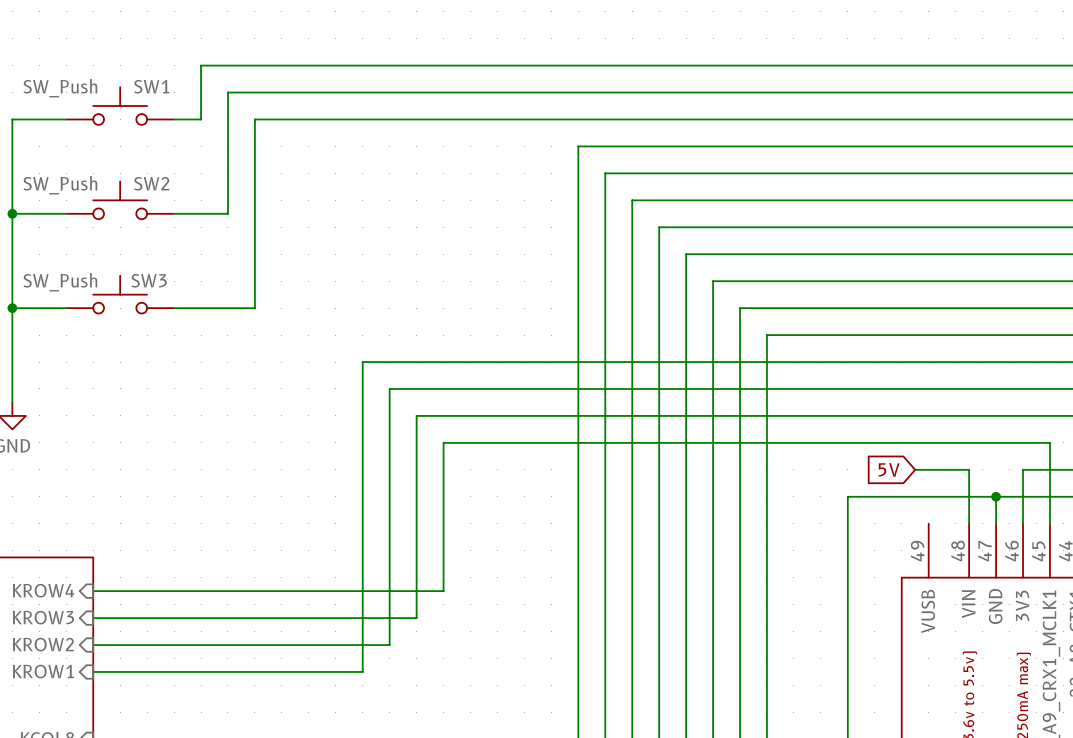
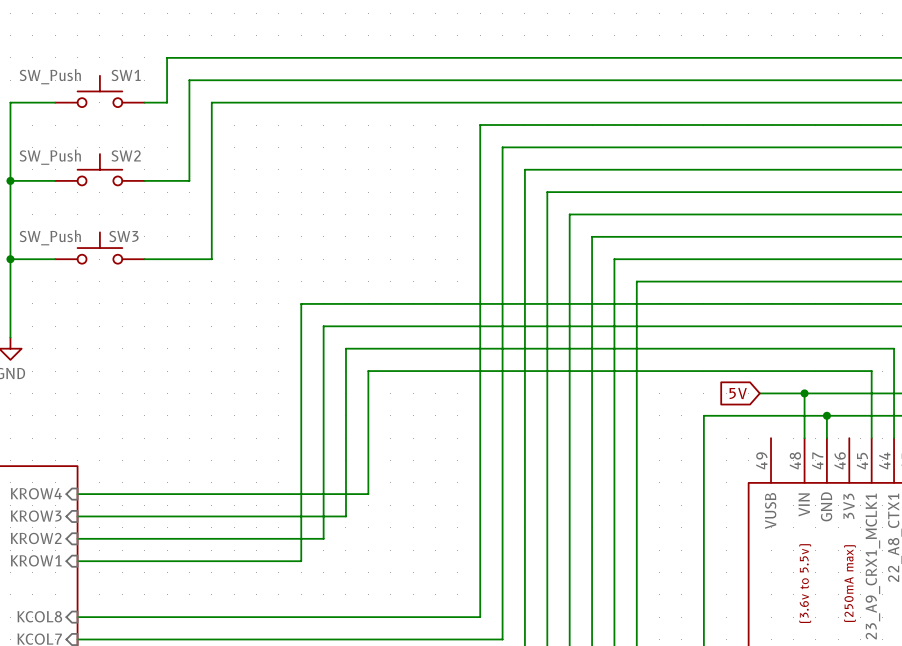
junction: none -> (804, 393)
wire: (1023, 469) (1023, 523) -> (849, 393) (804, 393)

